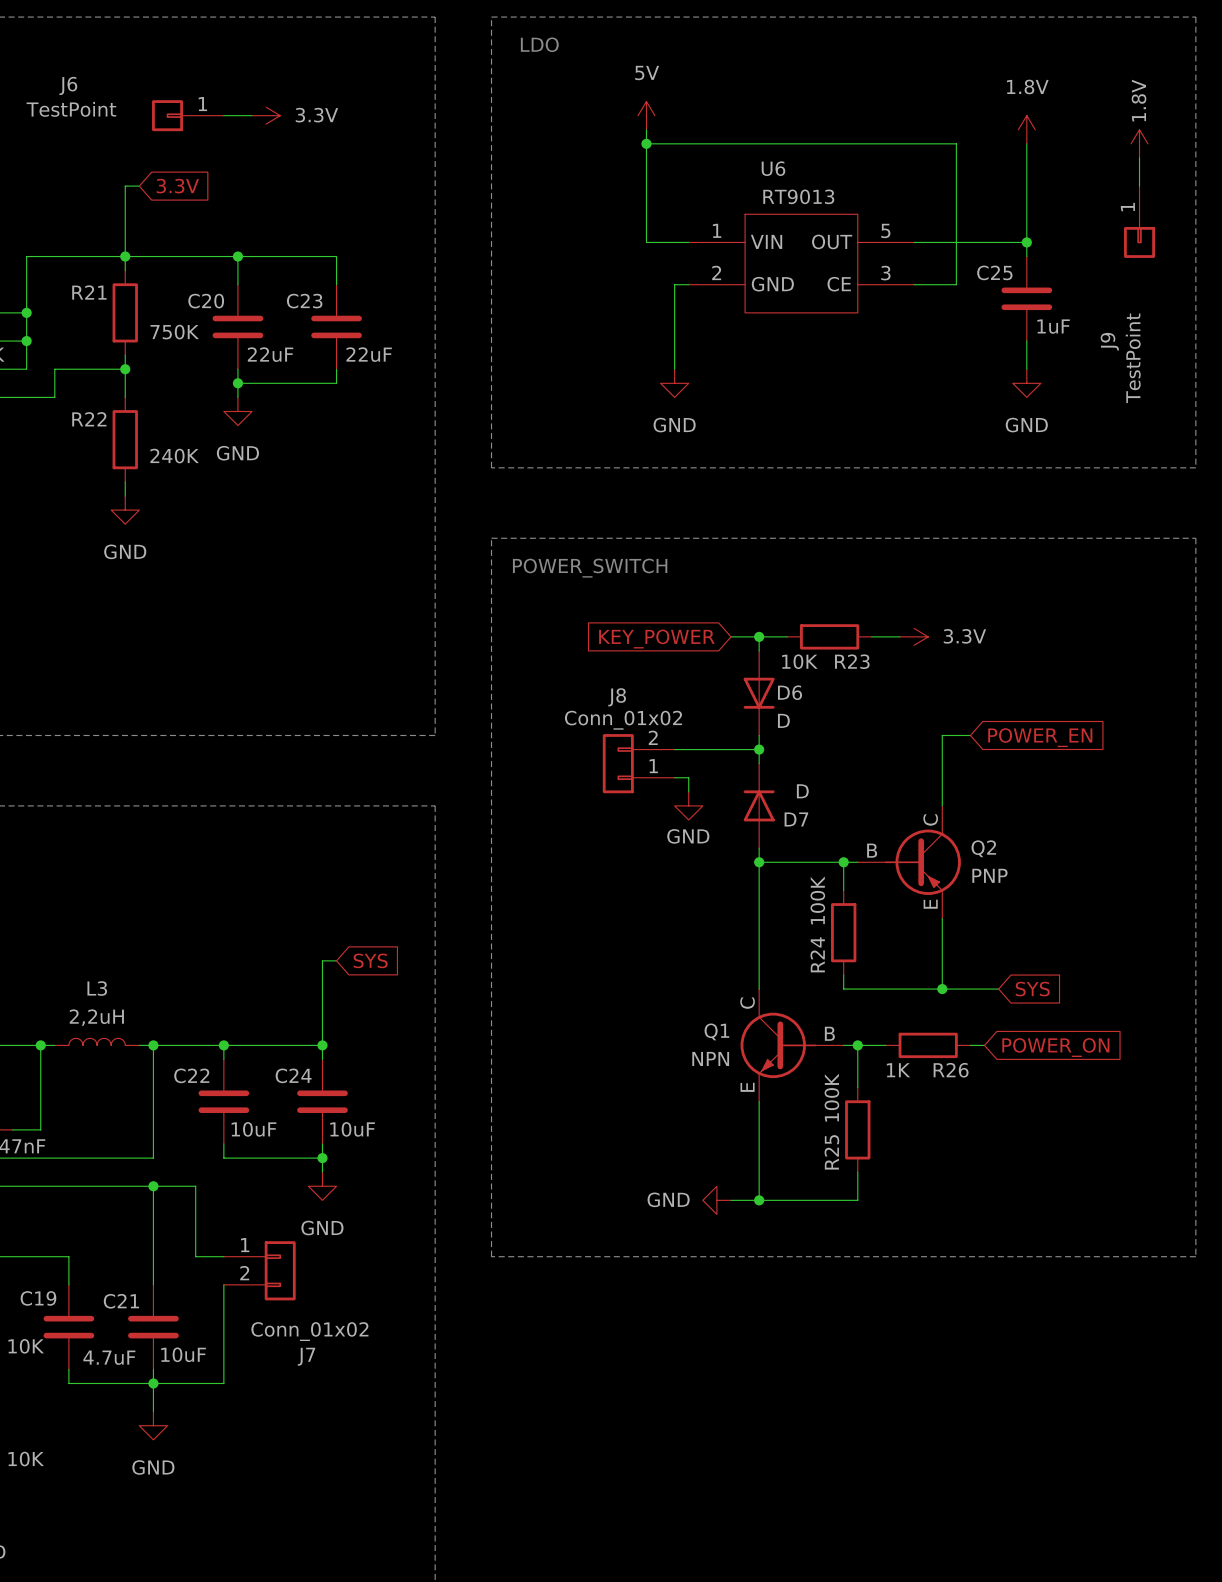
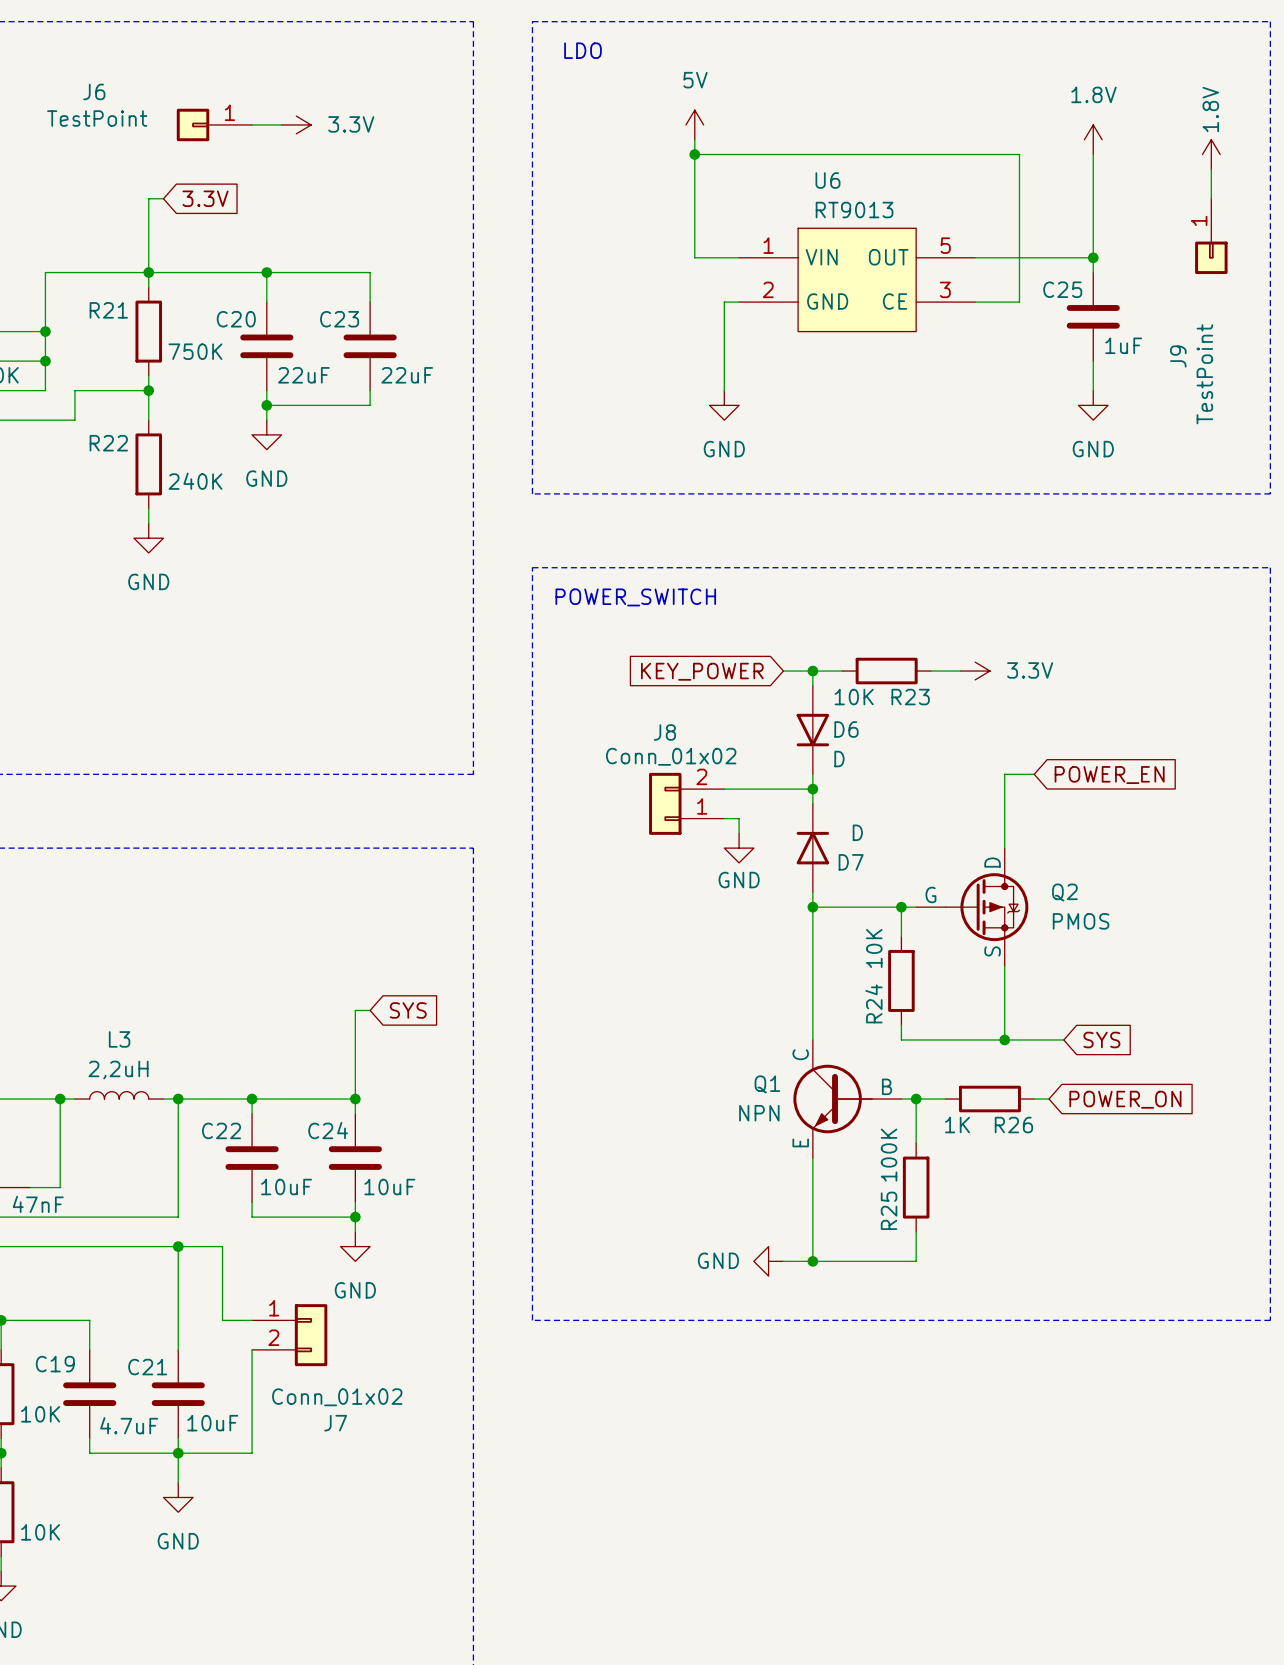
Q2 symbol: [857, 805, 961, 919] -> [916, 848, 1029, 967]
Q2 value: PNP (989, 875) -> PMOS (1081, 921)
R24 value: 100K (817, 900) -> 10K (874, 948)

